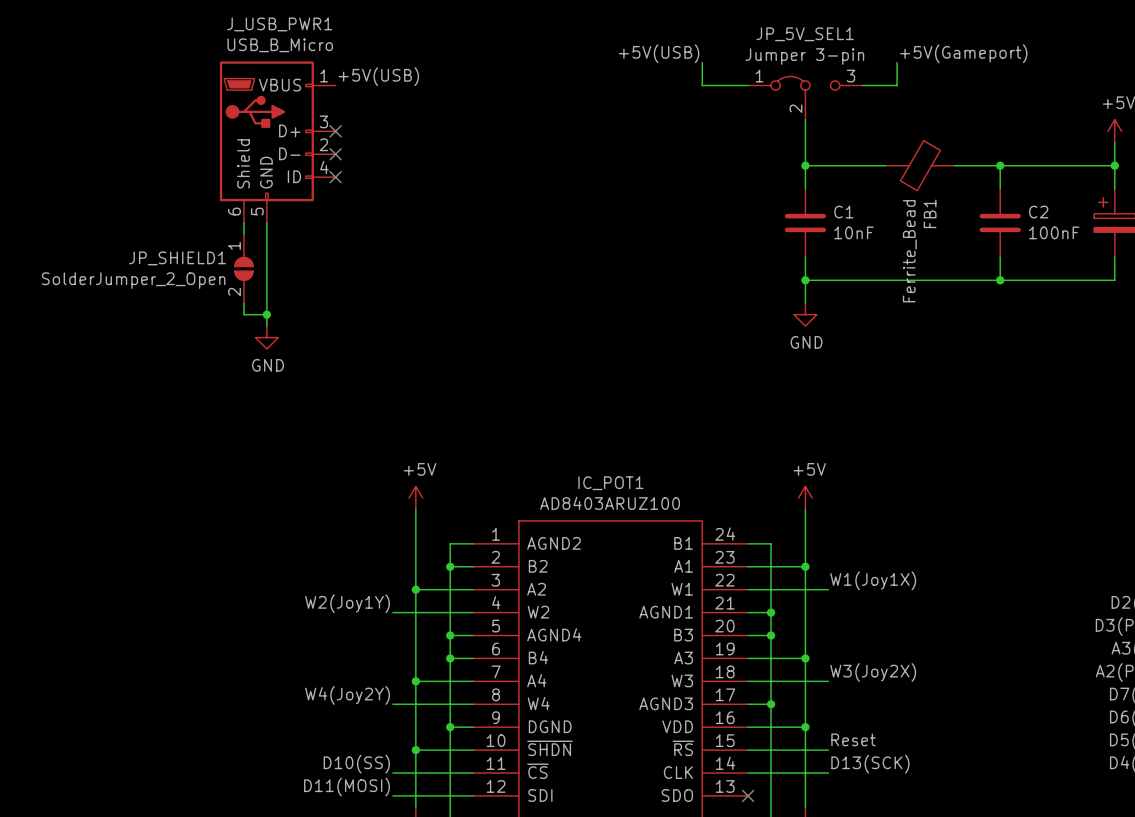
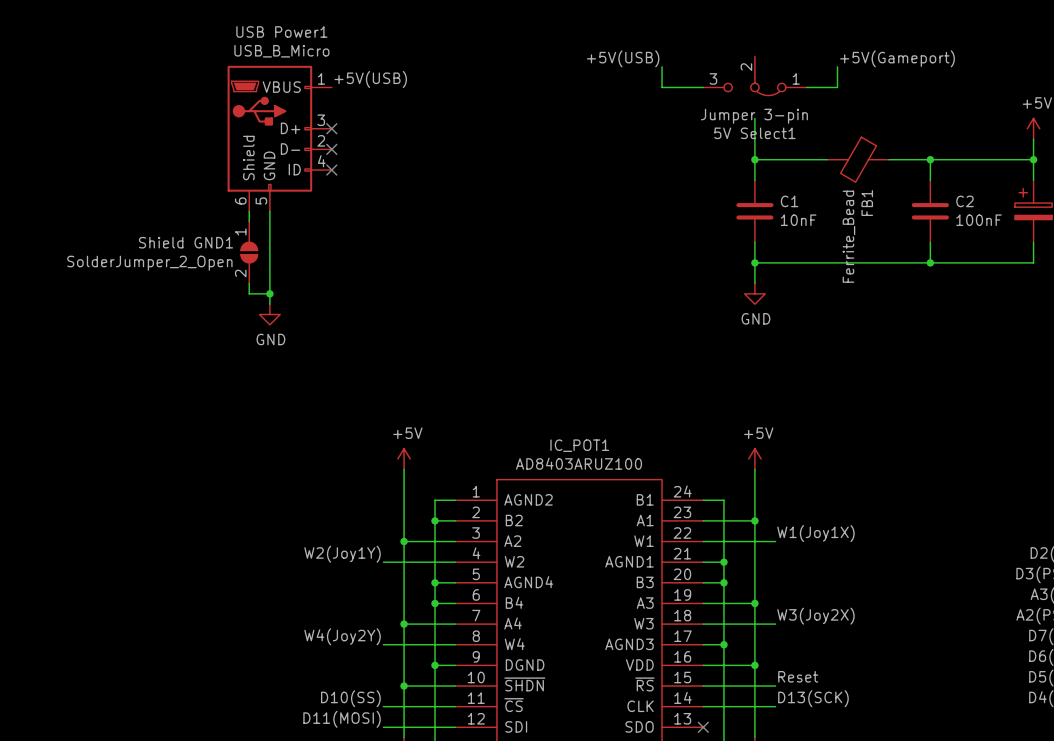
J_USB_PWR1 name: J_USB_PWR1 (279, 24) -> USB Power1 (281, 31)
5V Select1: none -> Jumper 3-pin (754, 76)
JP_5V_SEL1: Jumper 3-pin (805, 98) -> none
JP_SHIELD1 name: JP_SHIELD1 (177, 258) -> Shield GND1 (186, 242)

